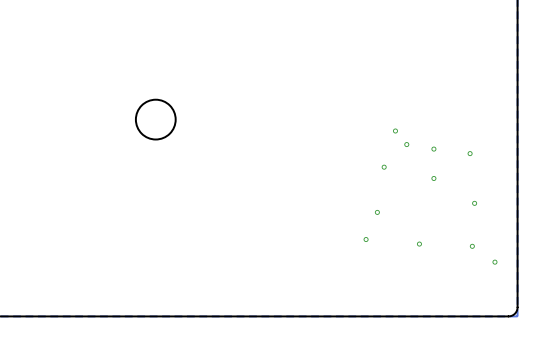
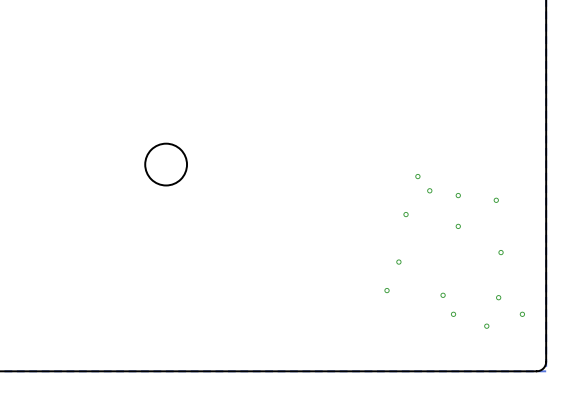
via: none -> (453, 314)
via: none -> (486, 326)

